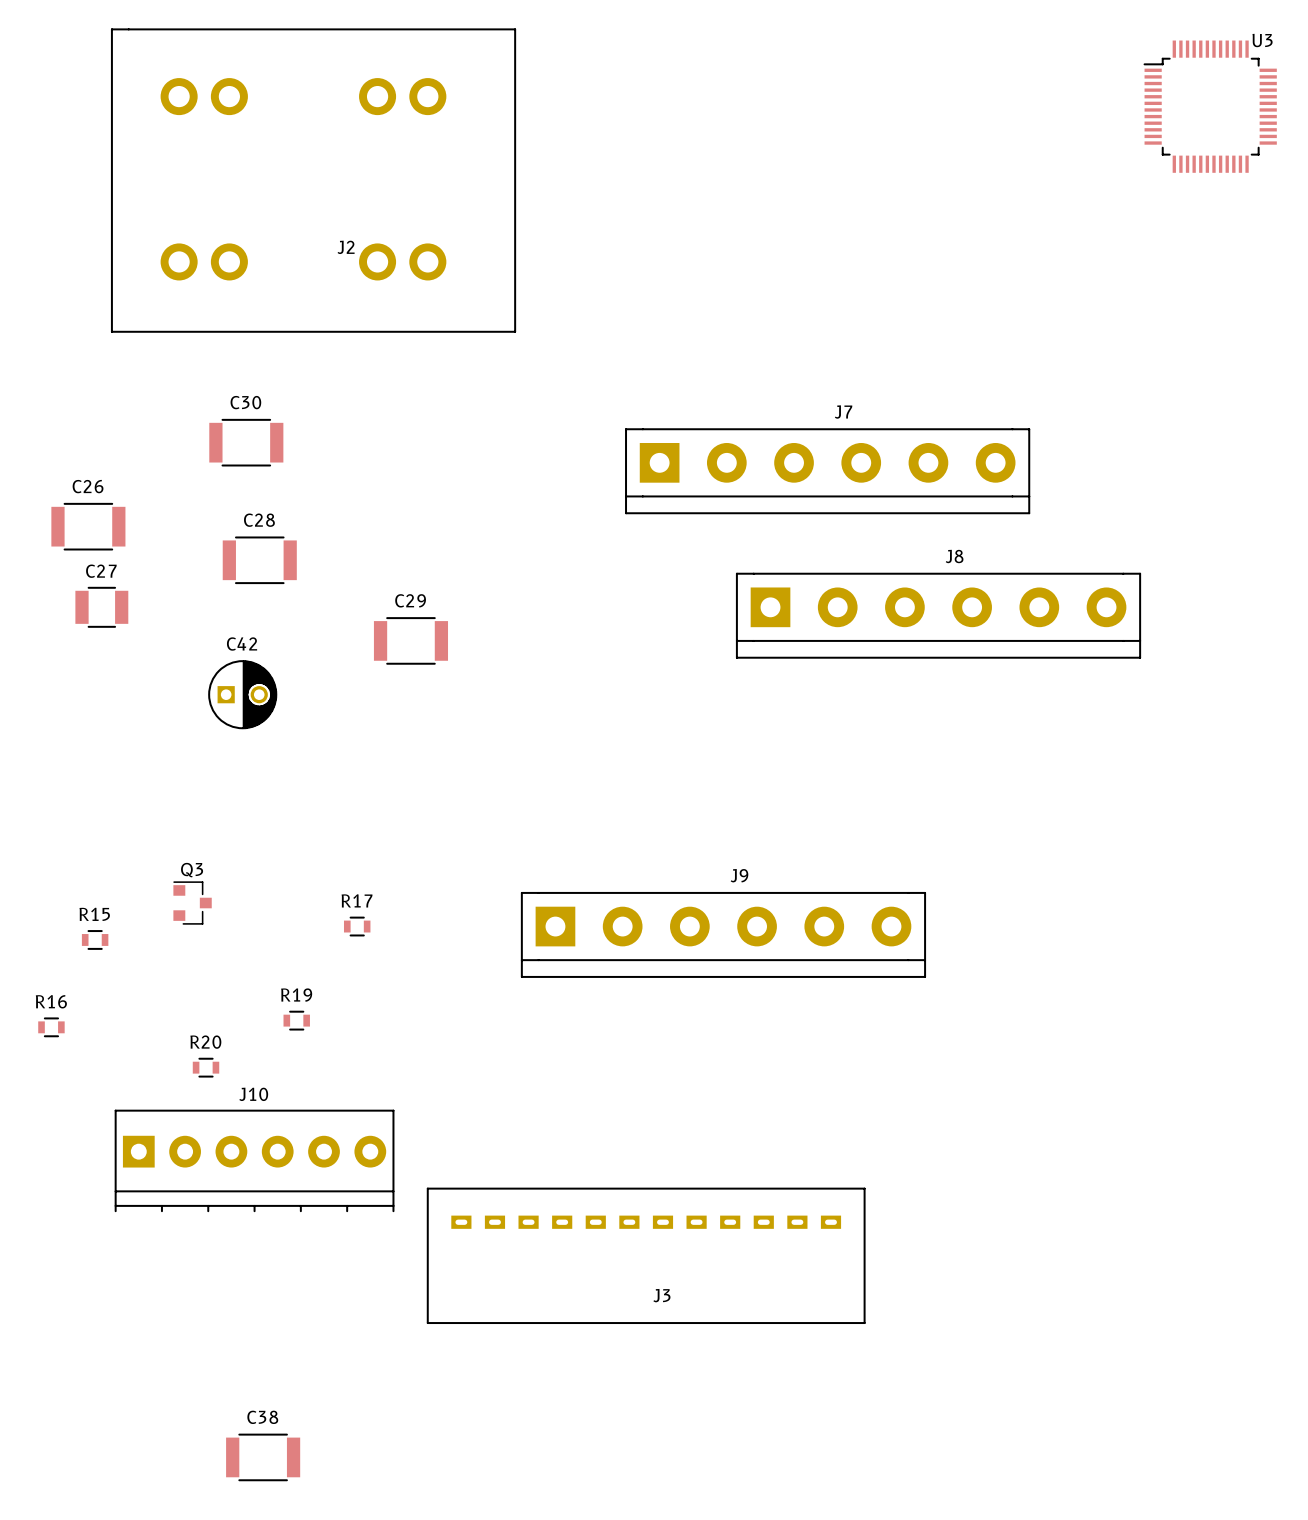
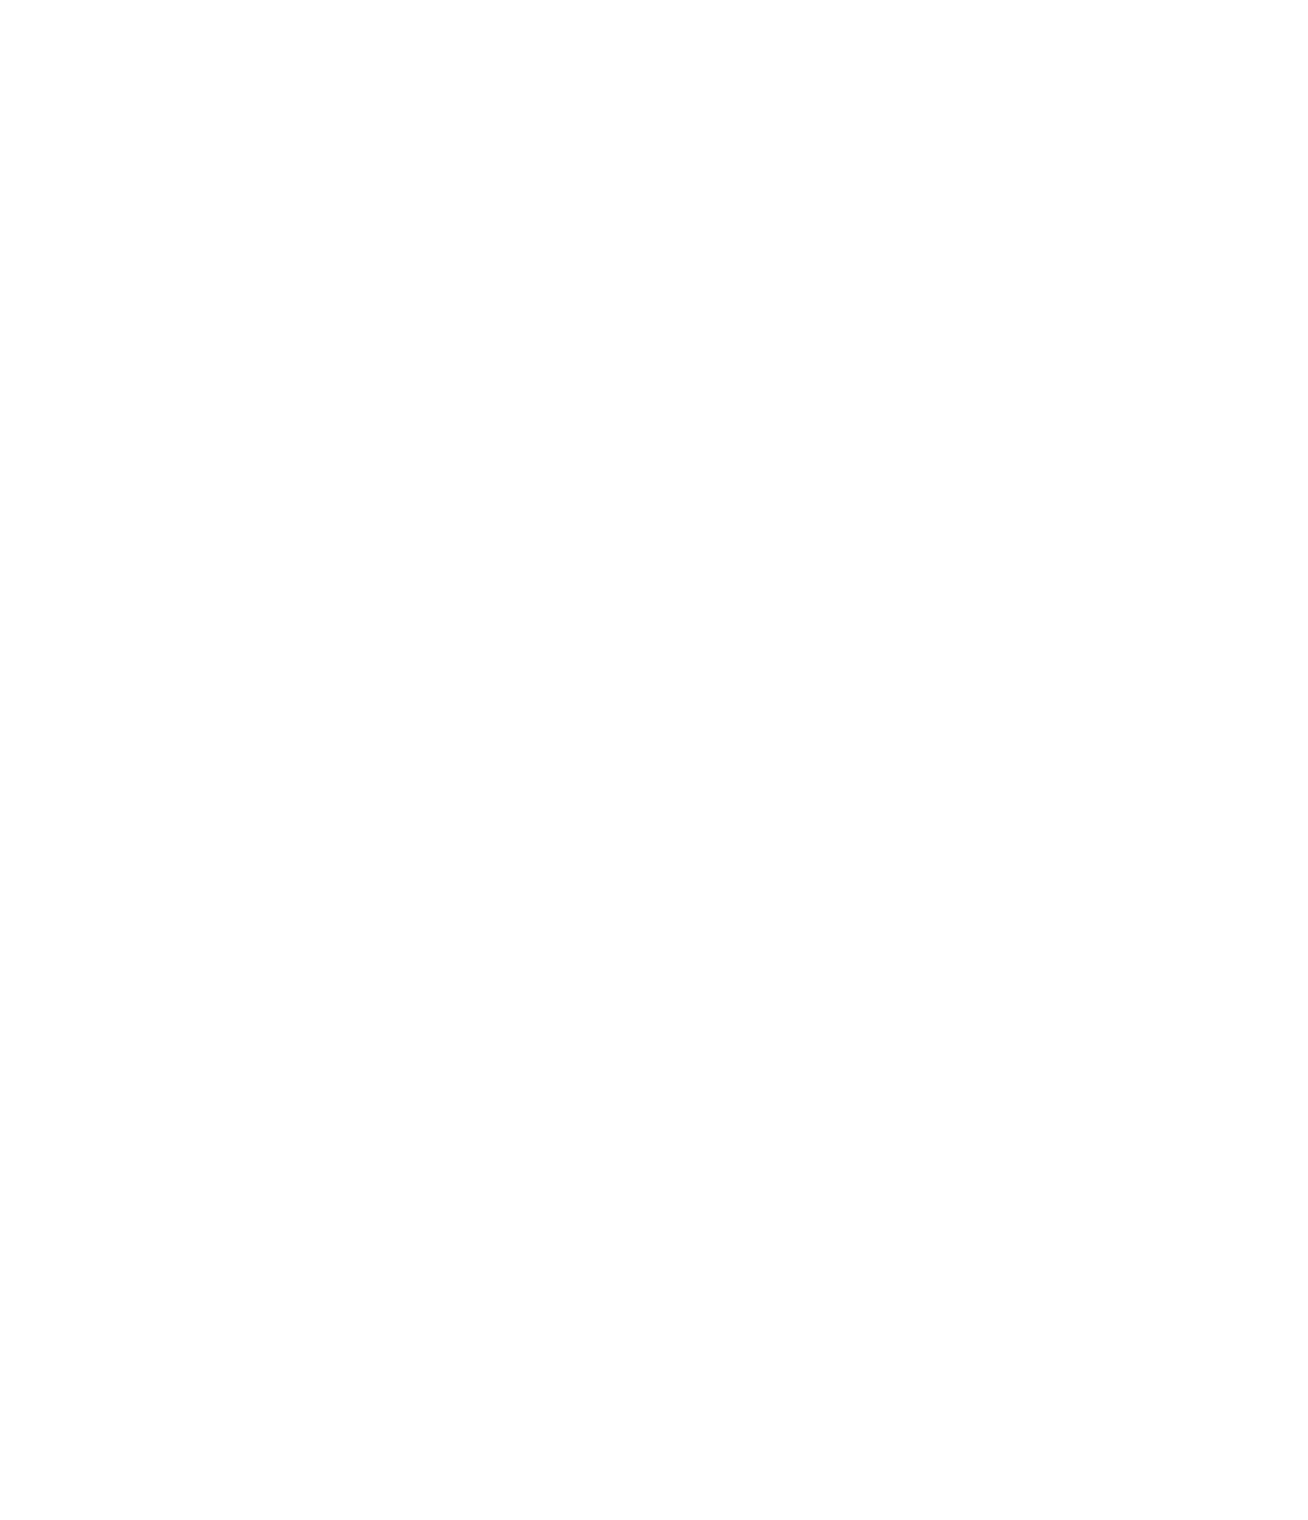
U3: (1210, 106) -> none
J2: (313, 180) -> none
C30: (246, 442) -> none
J7: (827, 471) -> none
C26: (88, 526) -> none
C28: (259, 560) -> none
C27: (101, 607) -> none
J8: (938, 615) -> none
C29: (410, 640) -> none
C42: (242, 694) -> none
Q3: (192, 903) -> none
R17: (357, 926) -> none
J9: (723, 934) -> none
R15: (95, 939) -> none
R19: (296, 1020) -> none
R16: (51, 1027) -> none
R20: (206, 1067) -> none
J10: (254, 1160) -> none
J3: (646, 1255) -> none
C38: (263, 1457) -> none

